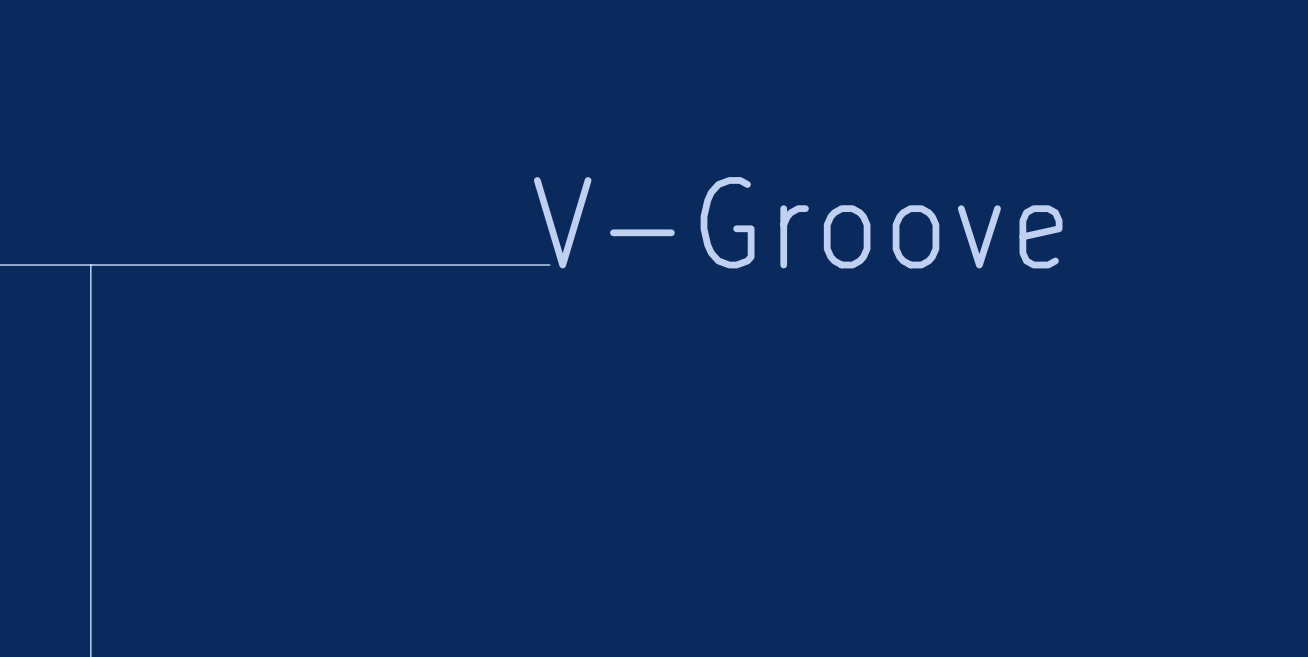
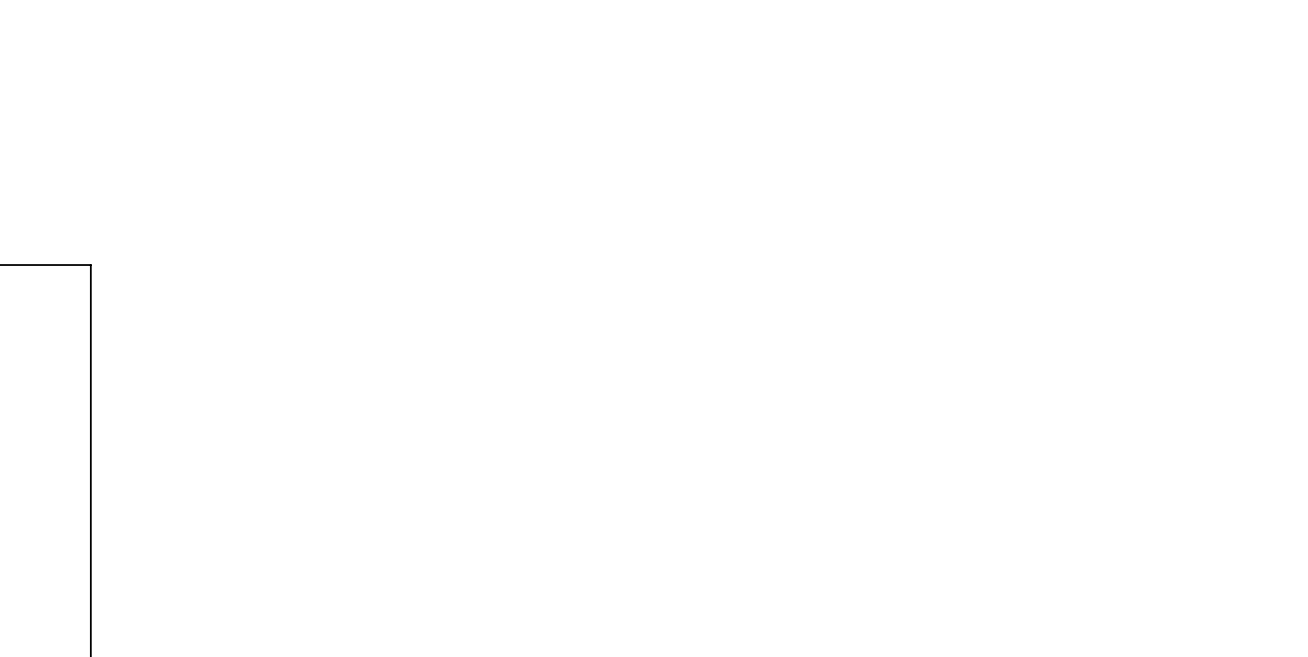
text: V-Groove (798, 222) -> none
board edge: (90, 265) (549, 265) -> none

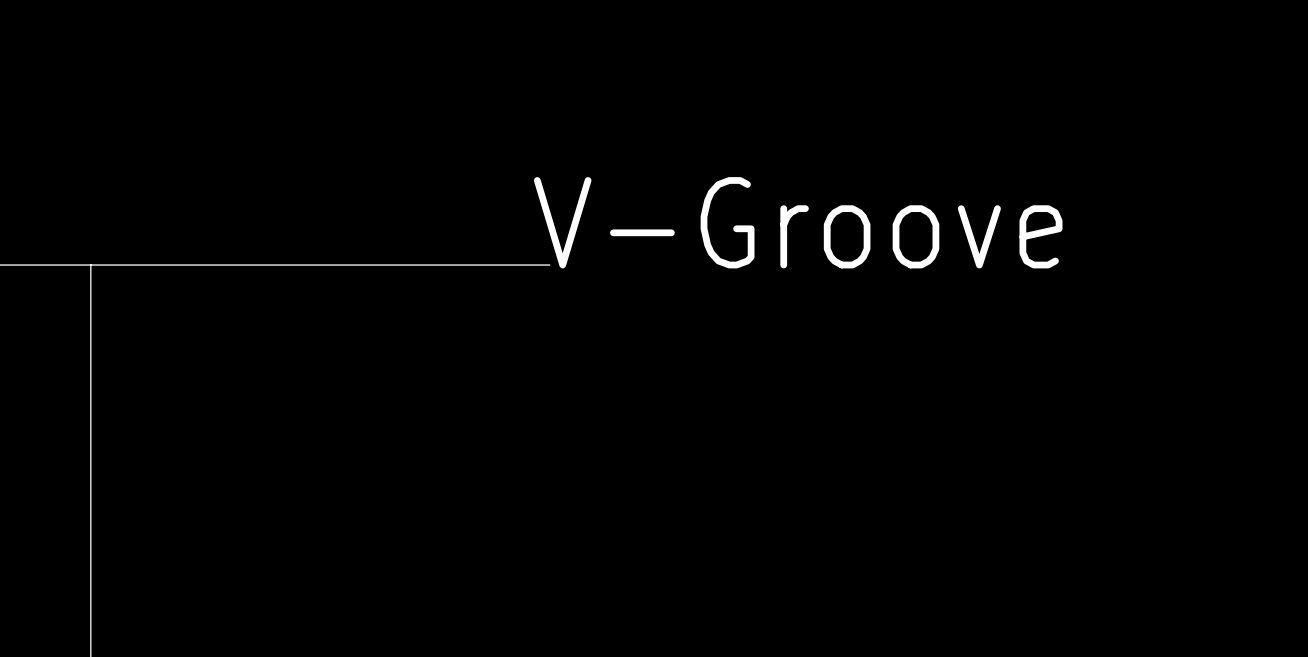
text: none -> V-Groove (798, 222)
board edge: none -> (90, 265) (549, 265)

